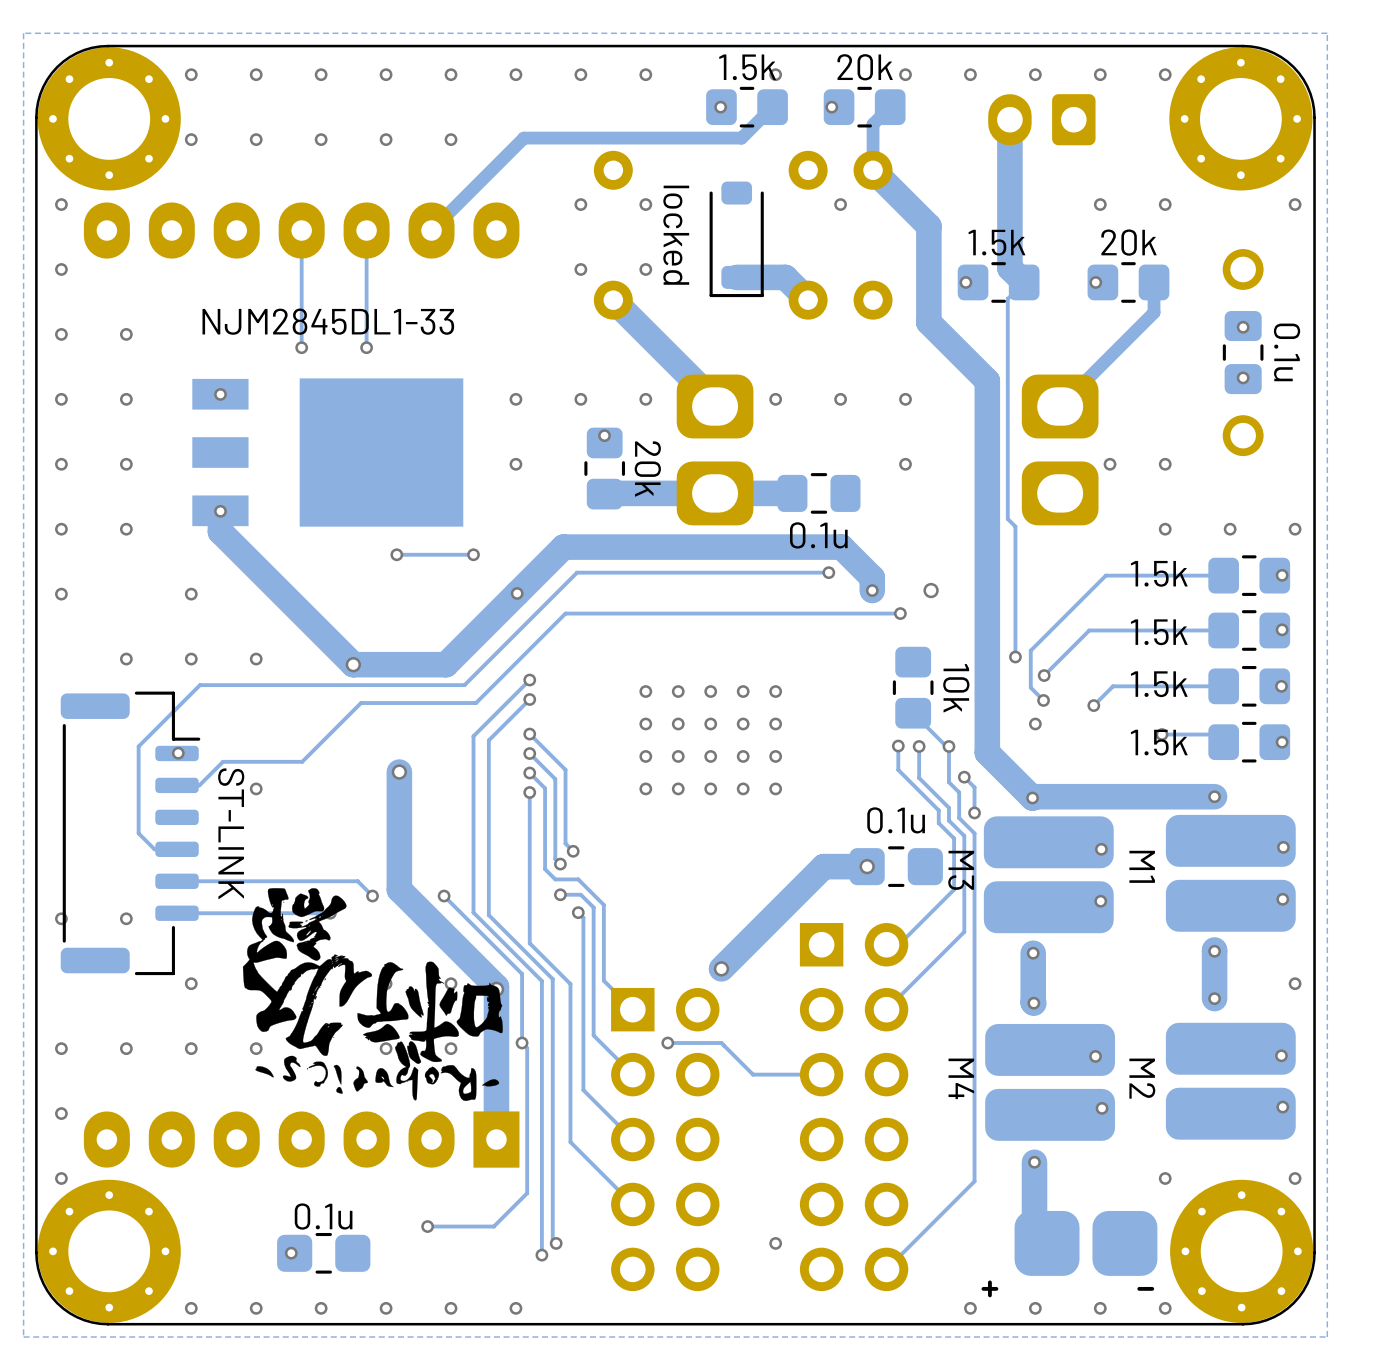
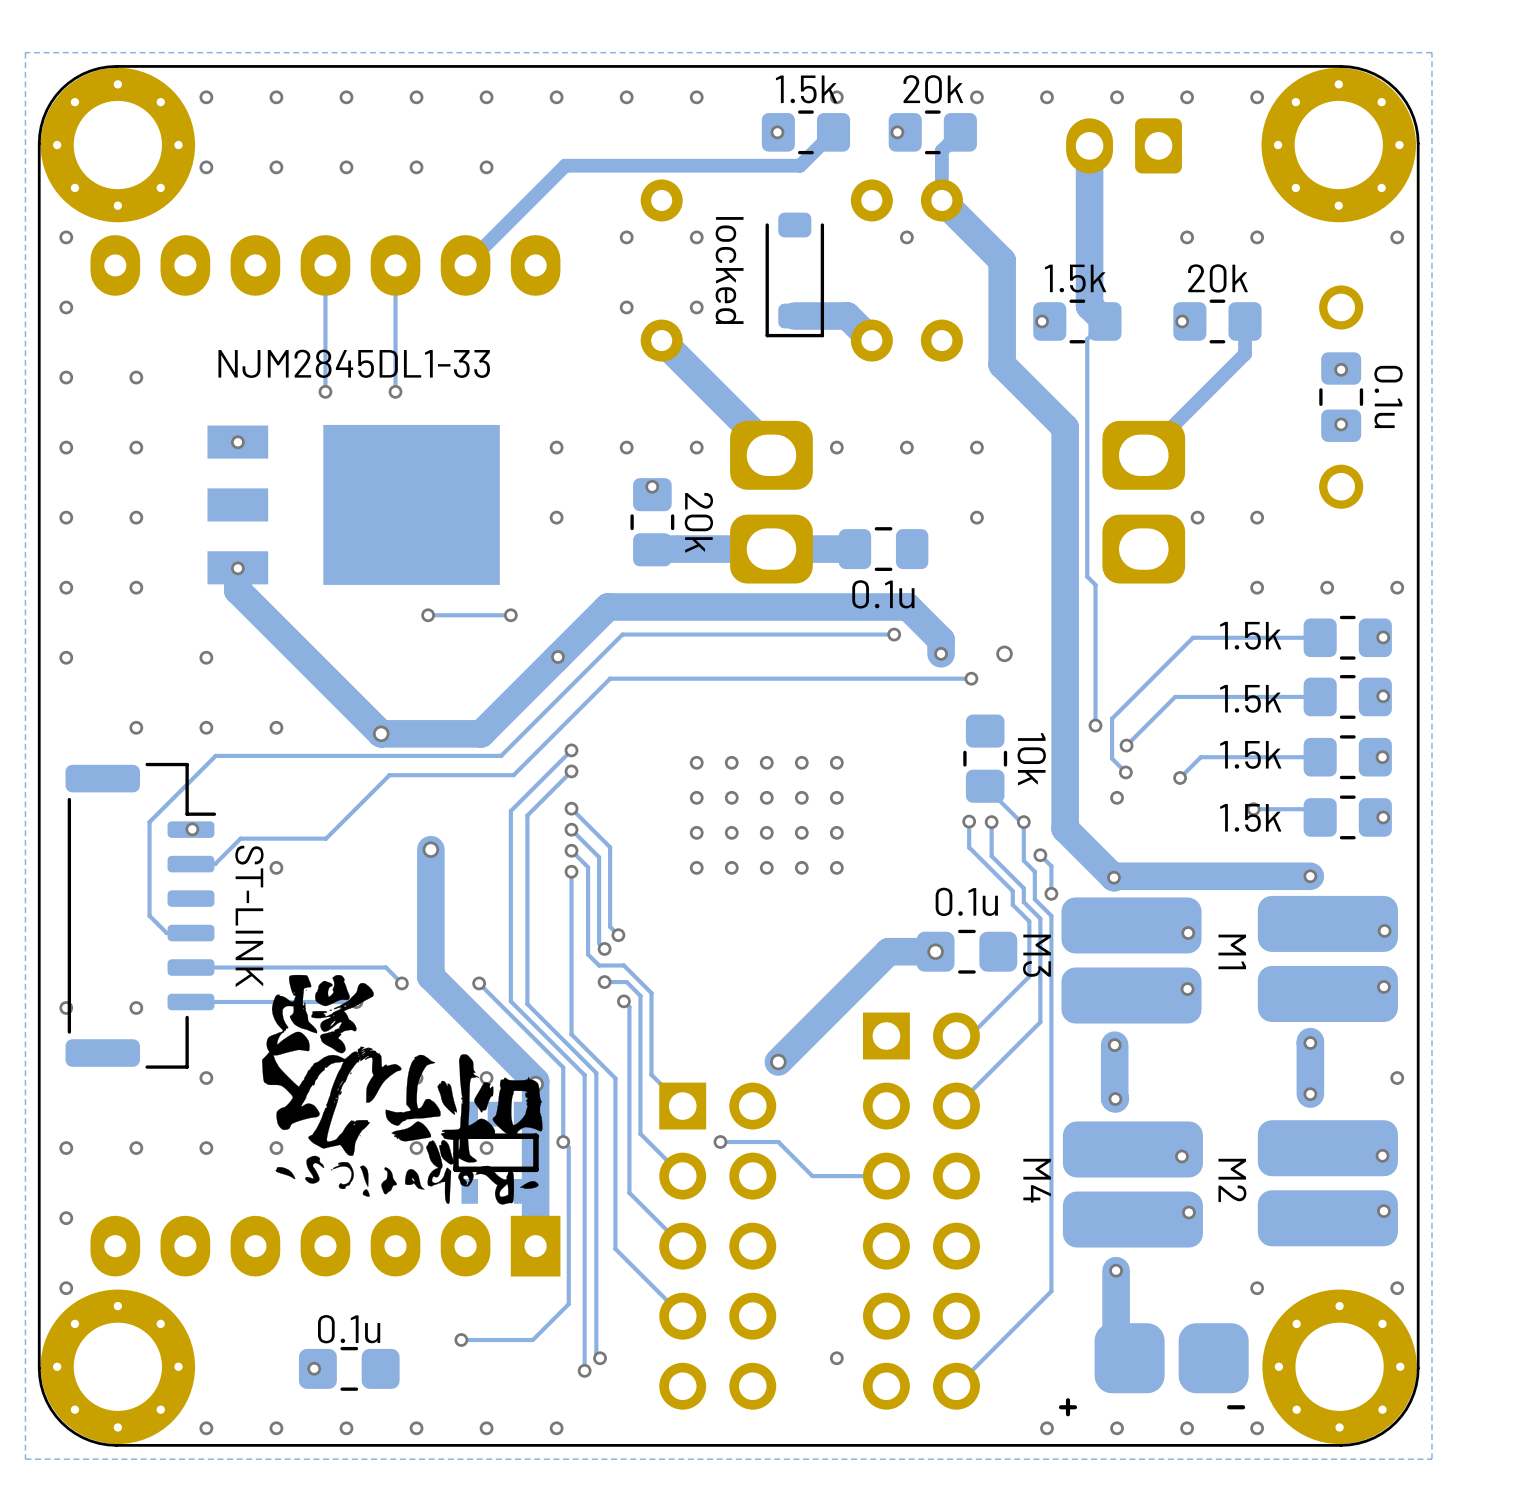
part: none -> (496, 1151)

